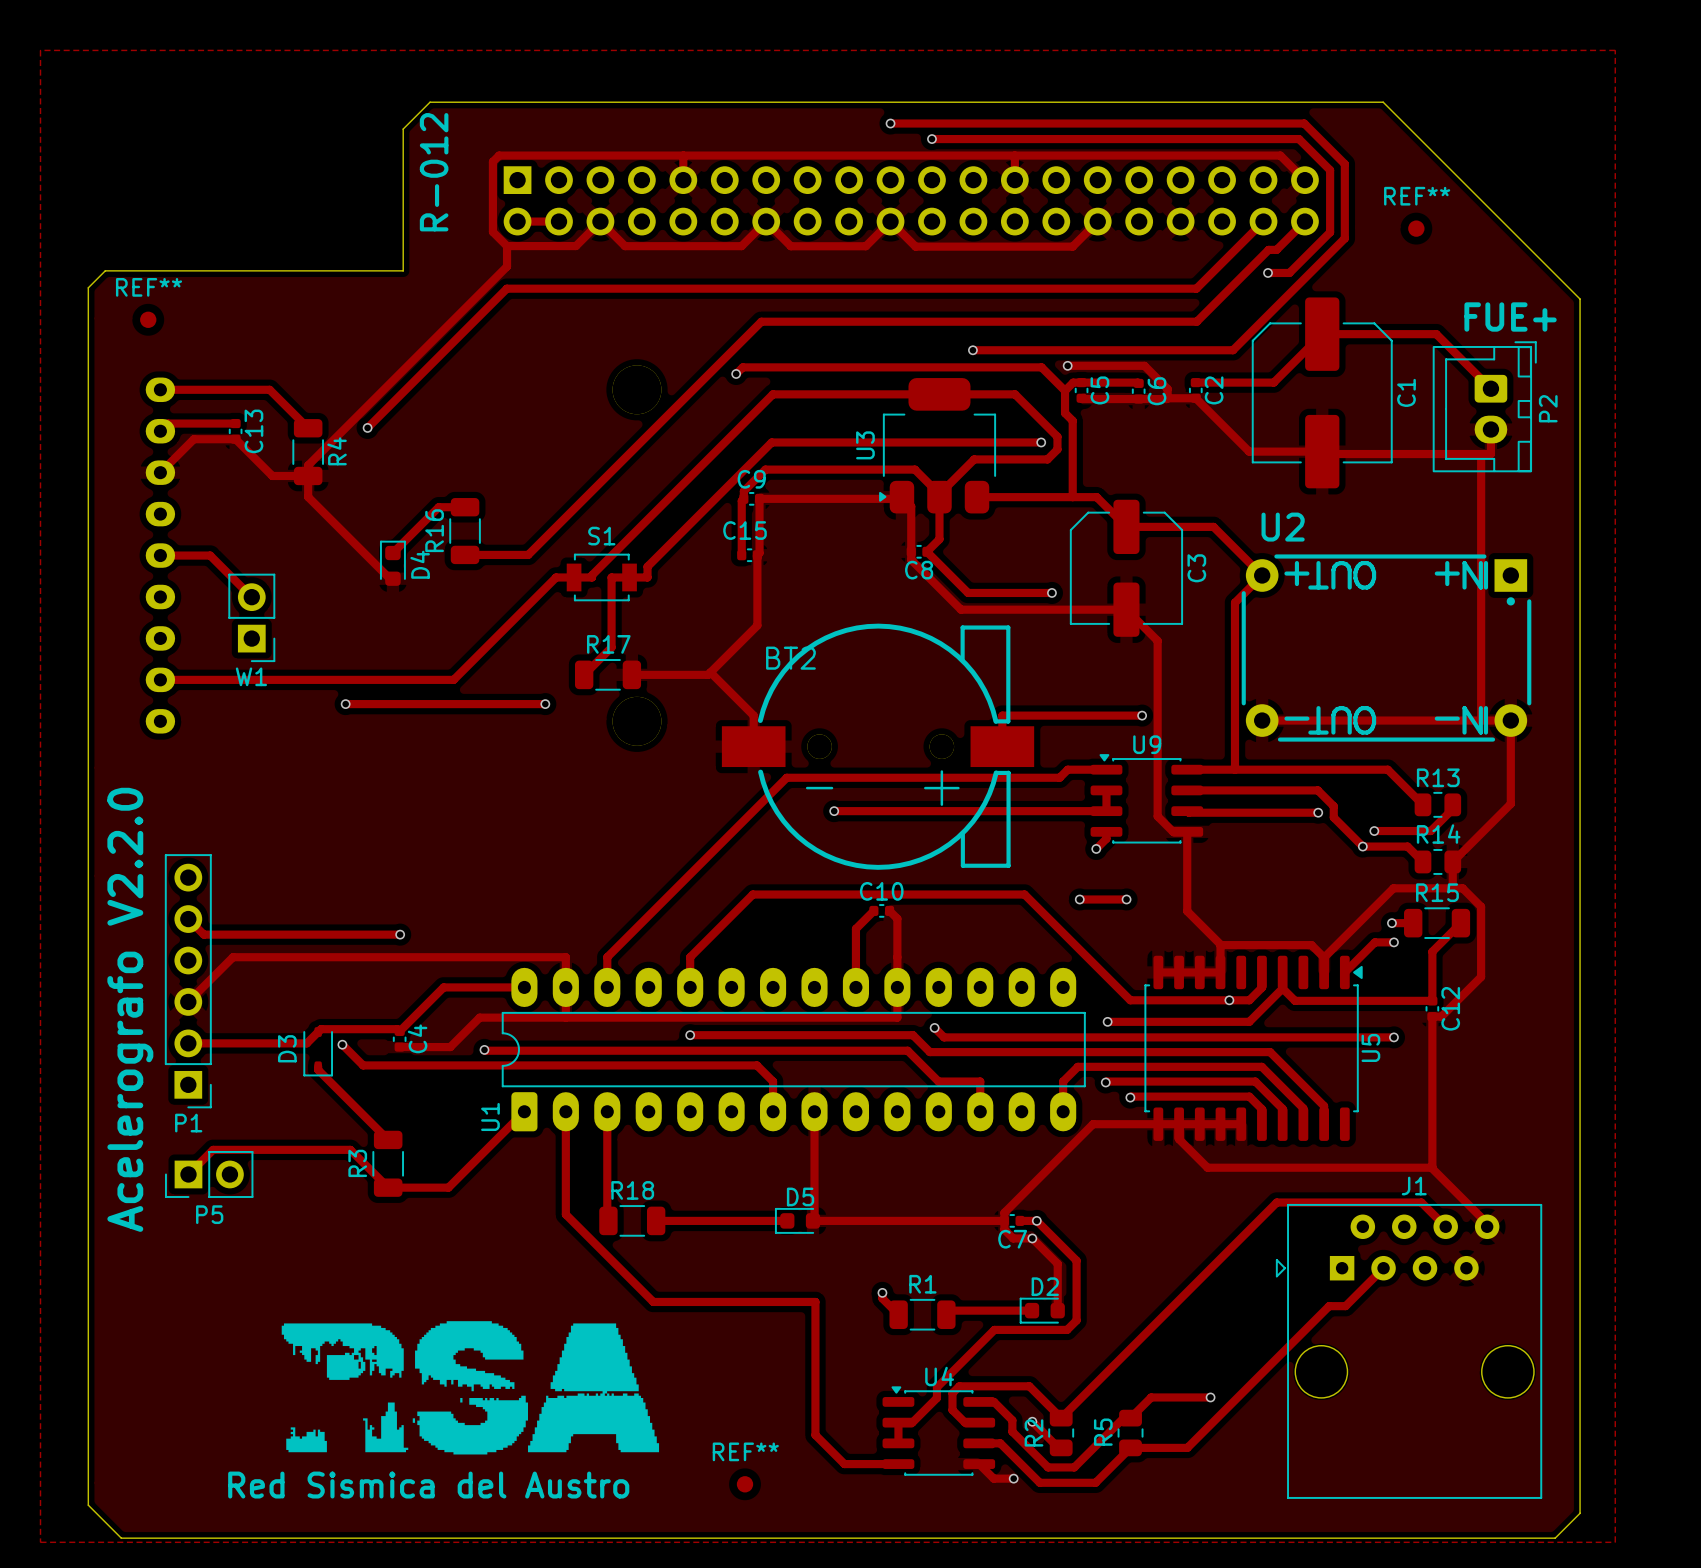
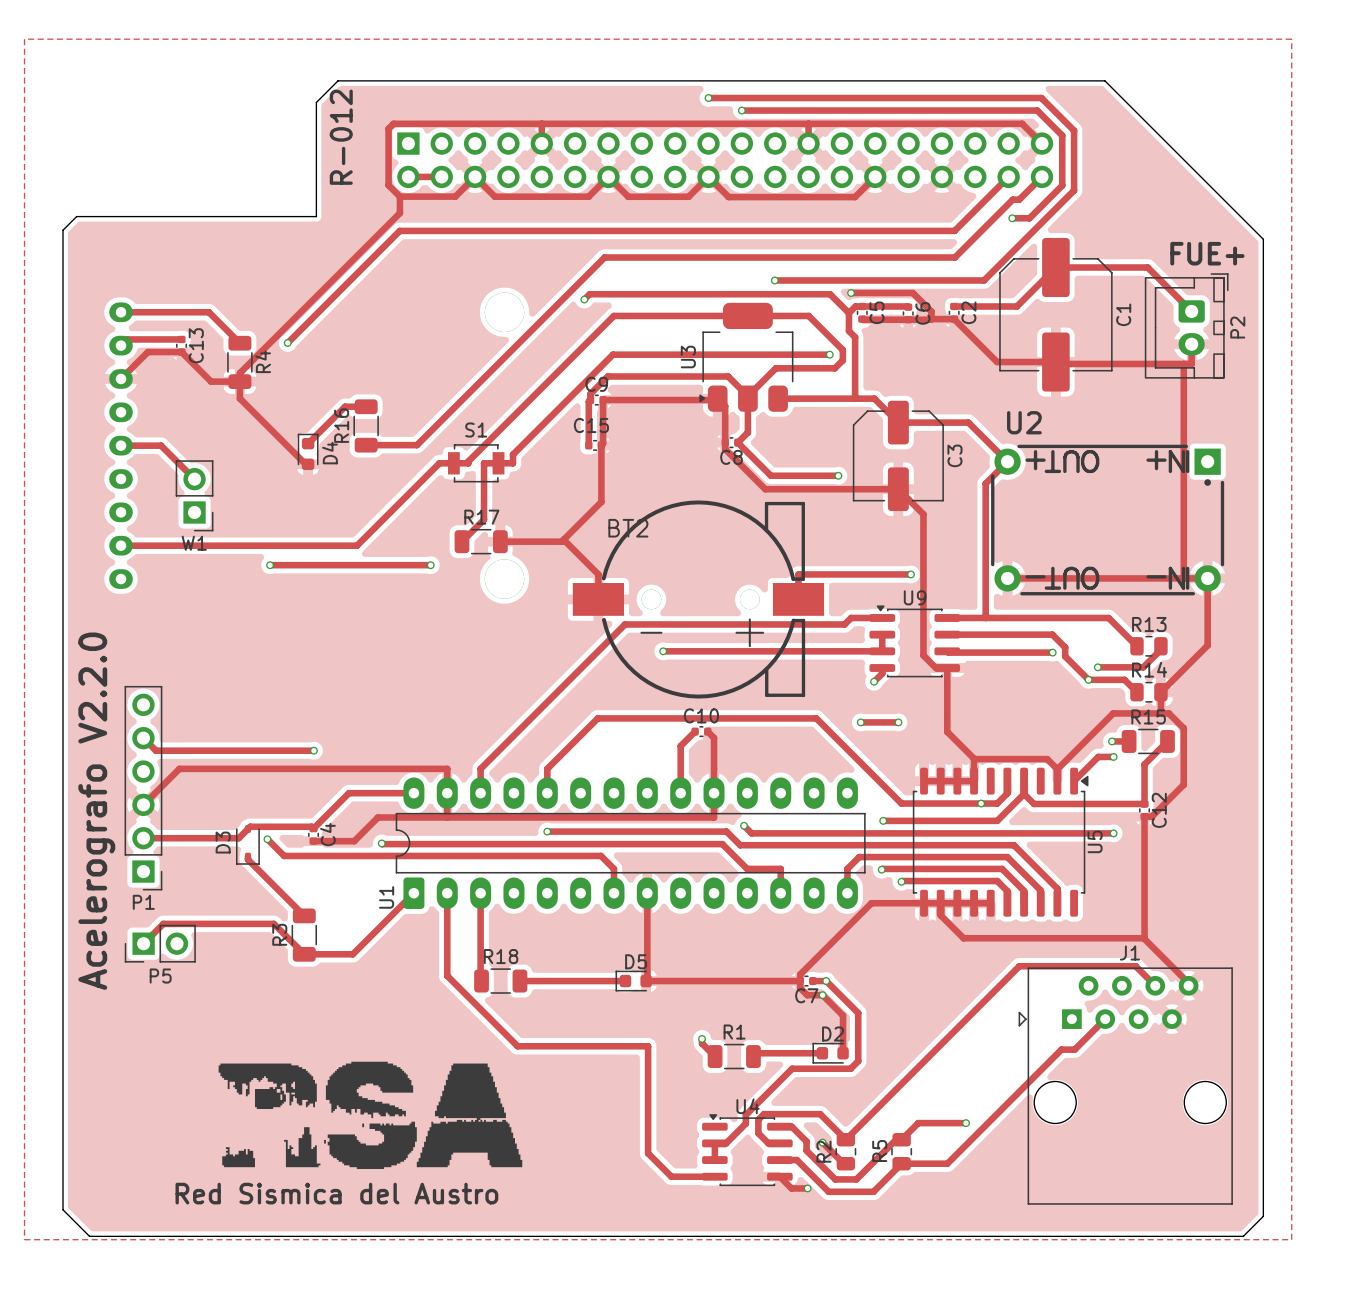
REF**: (1416, 228) -> none
REF**: (148, 319) -> none
REF**: (745, 1484) -> none

